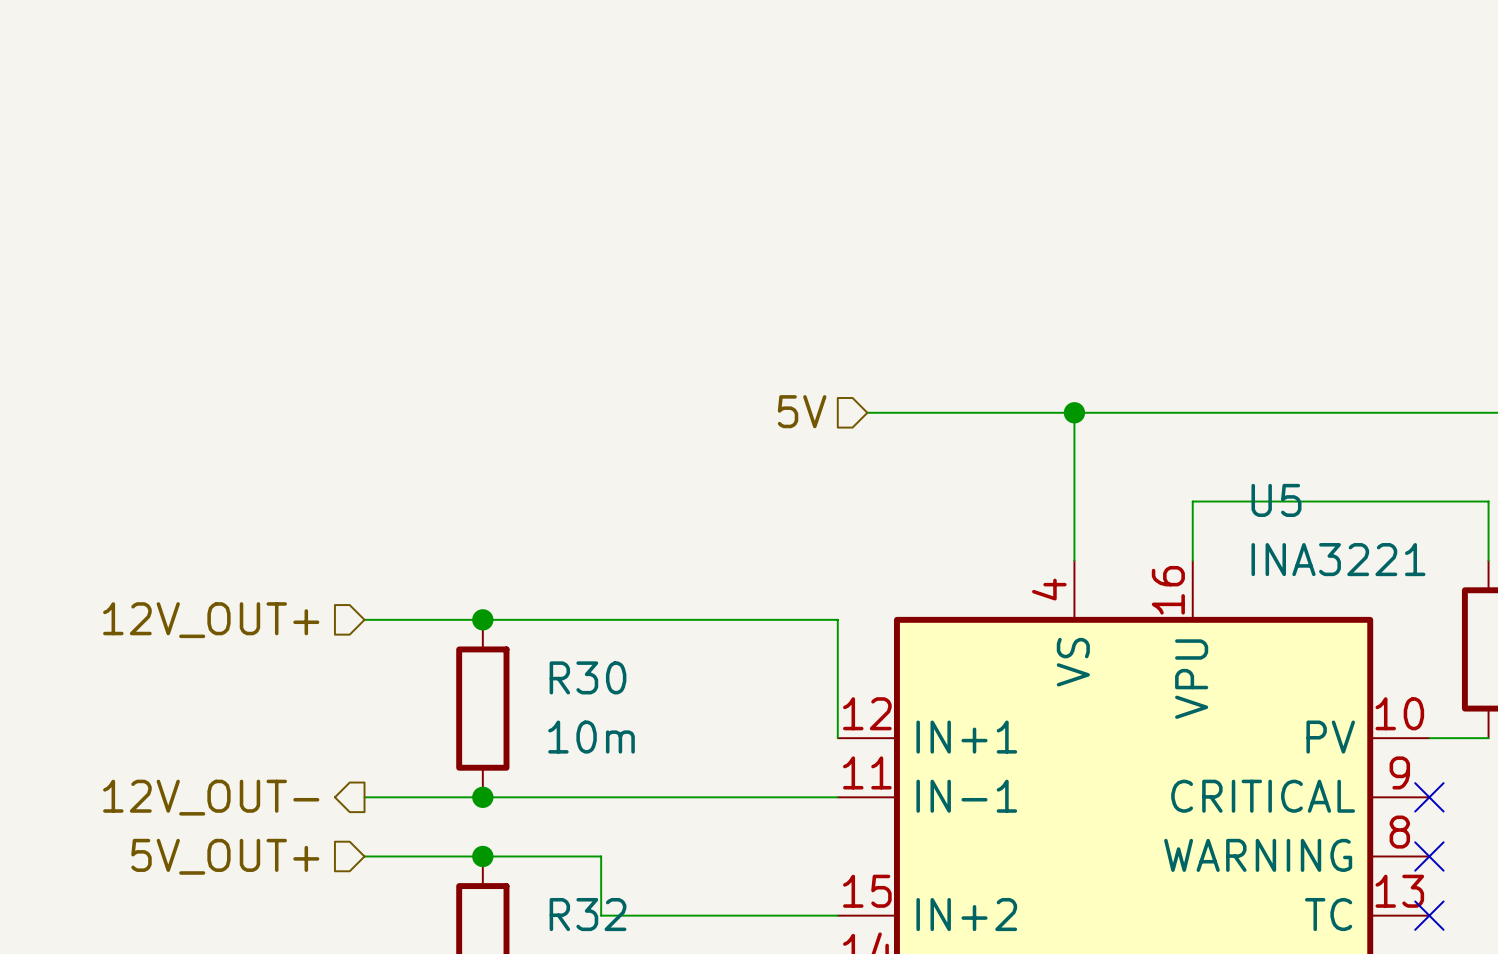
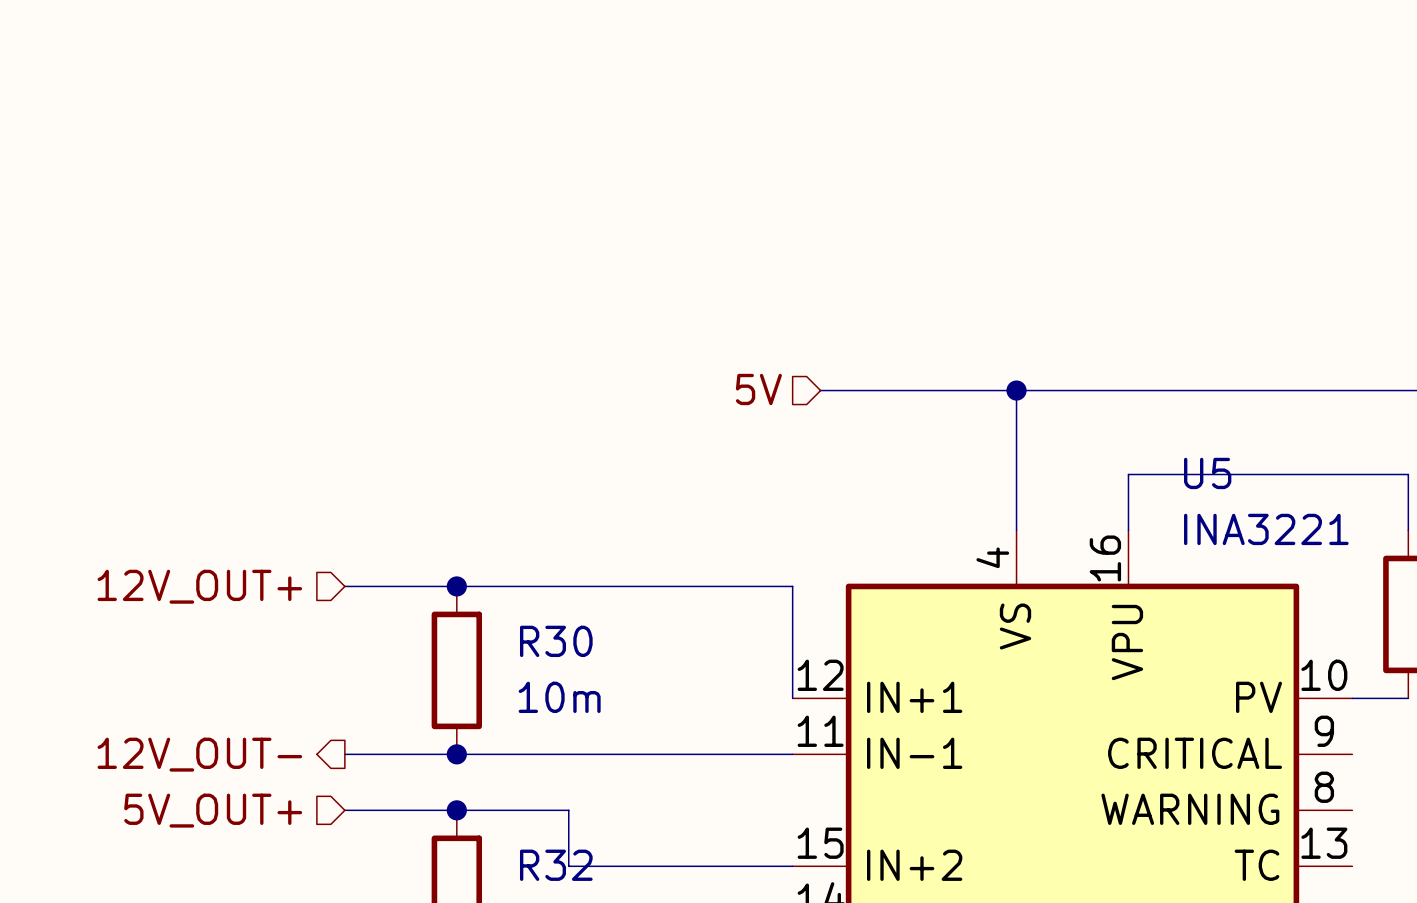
no-connect mark: (1429, 797) -> none
no-connect mark: (1429, 856) -> none
no-connect mark: (1429, 915) -> none

